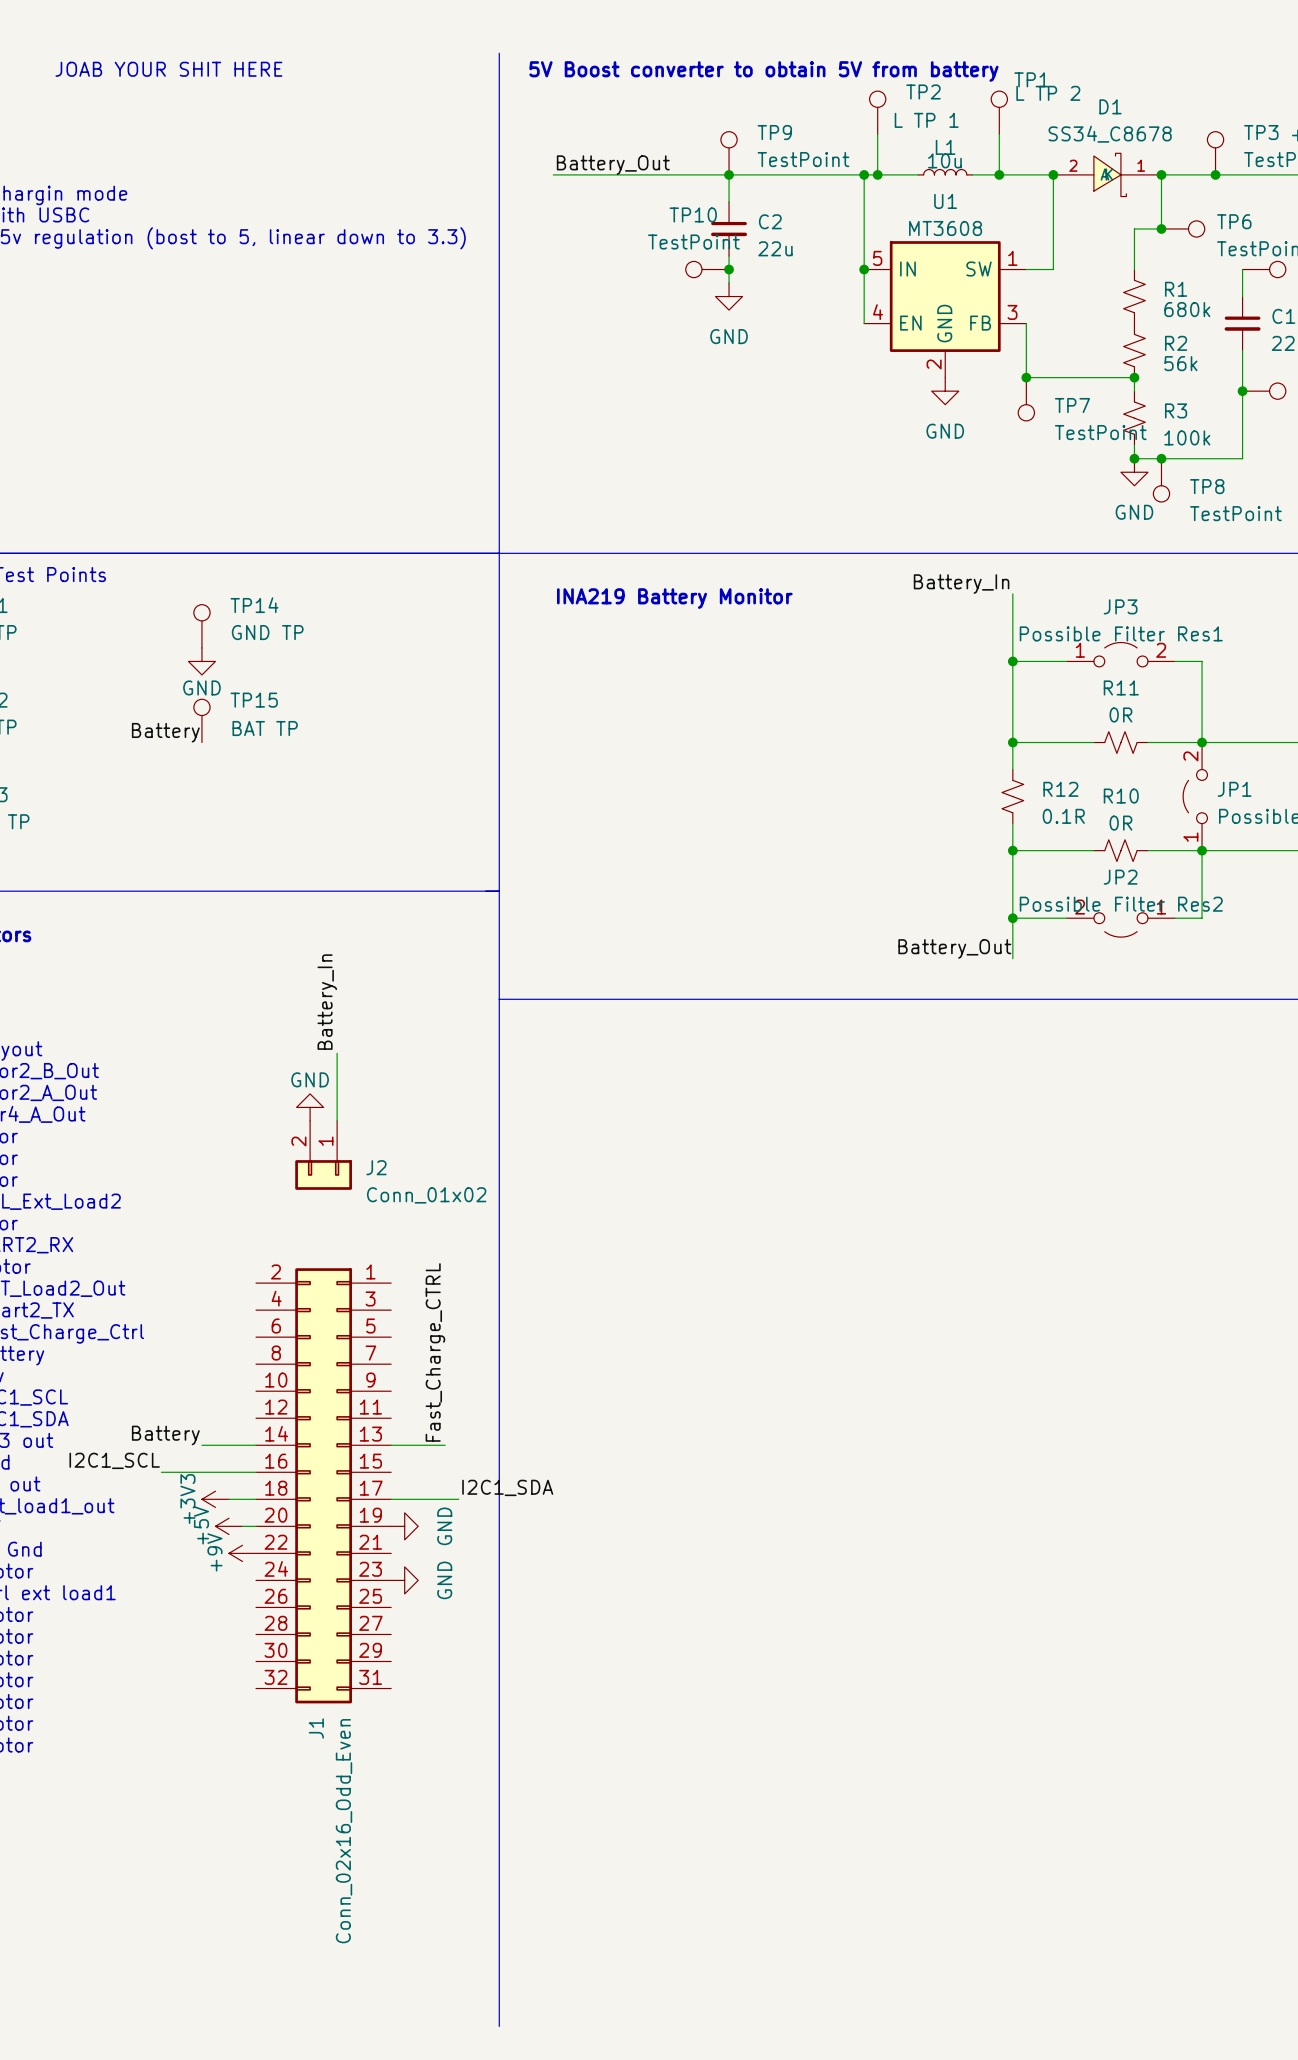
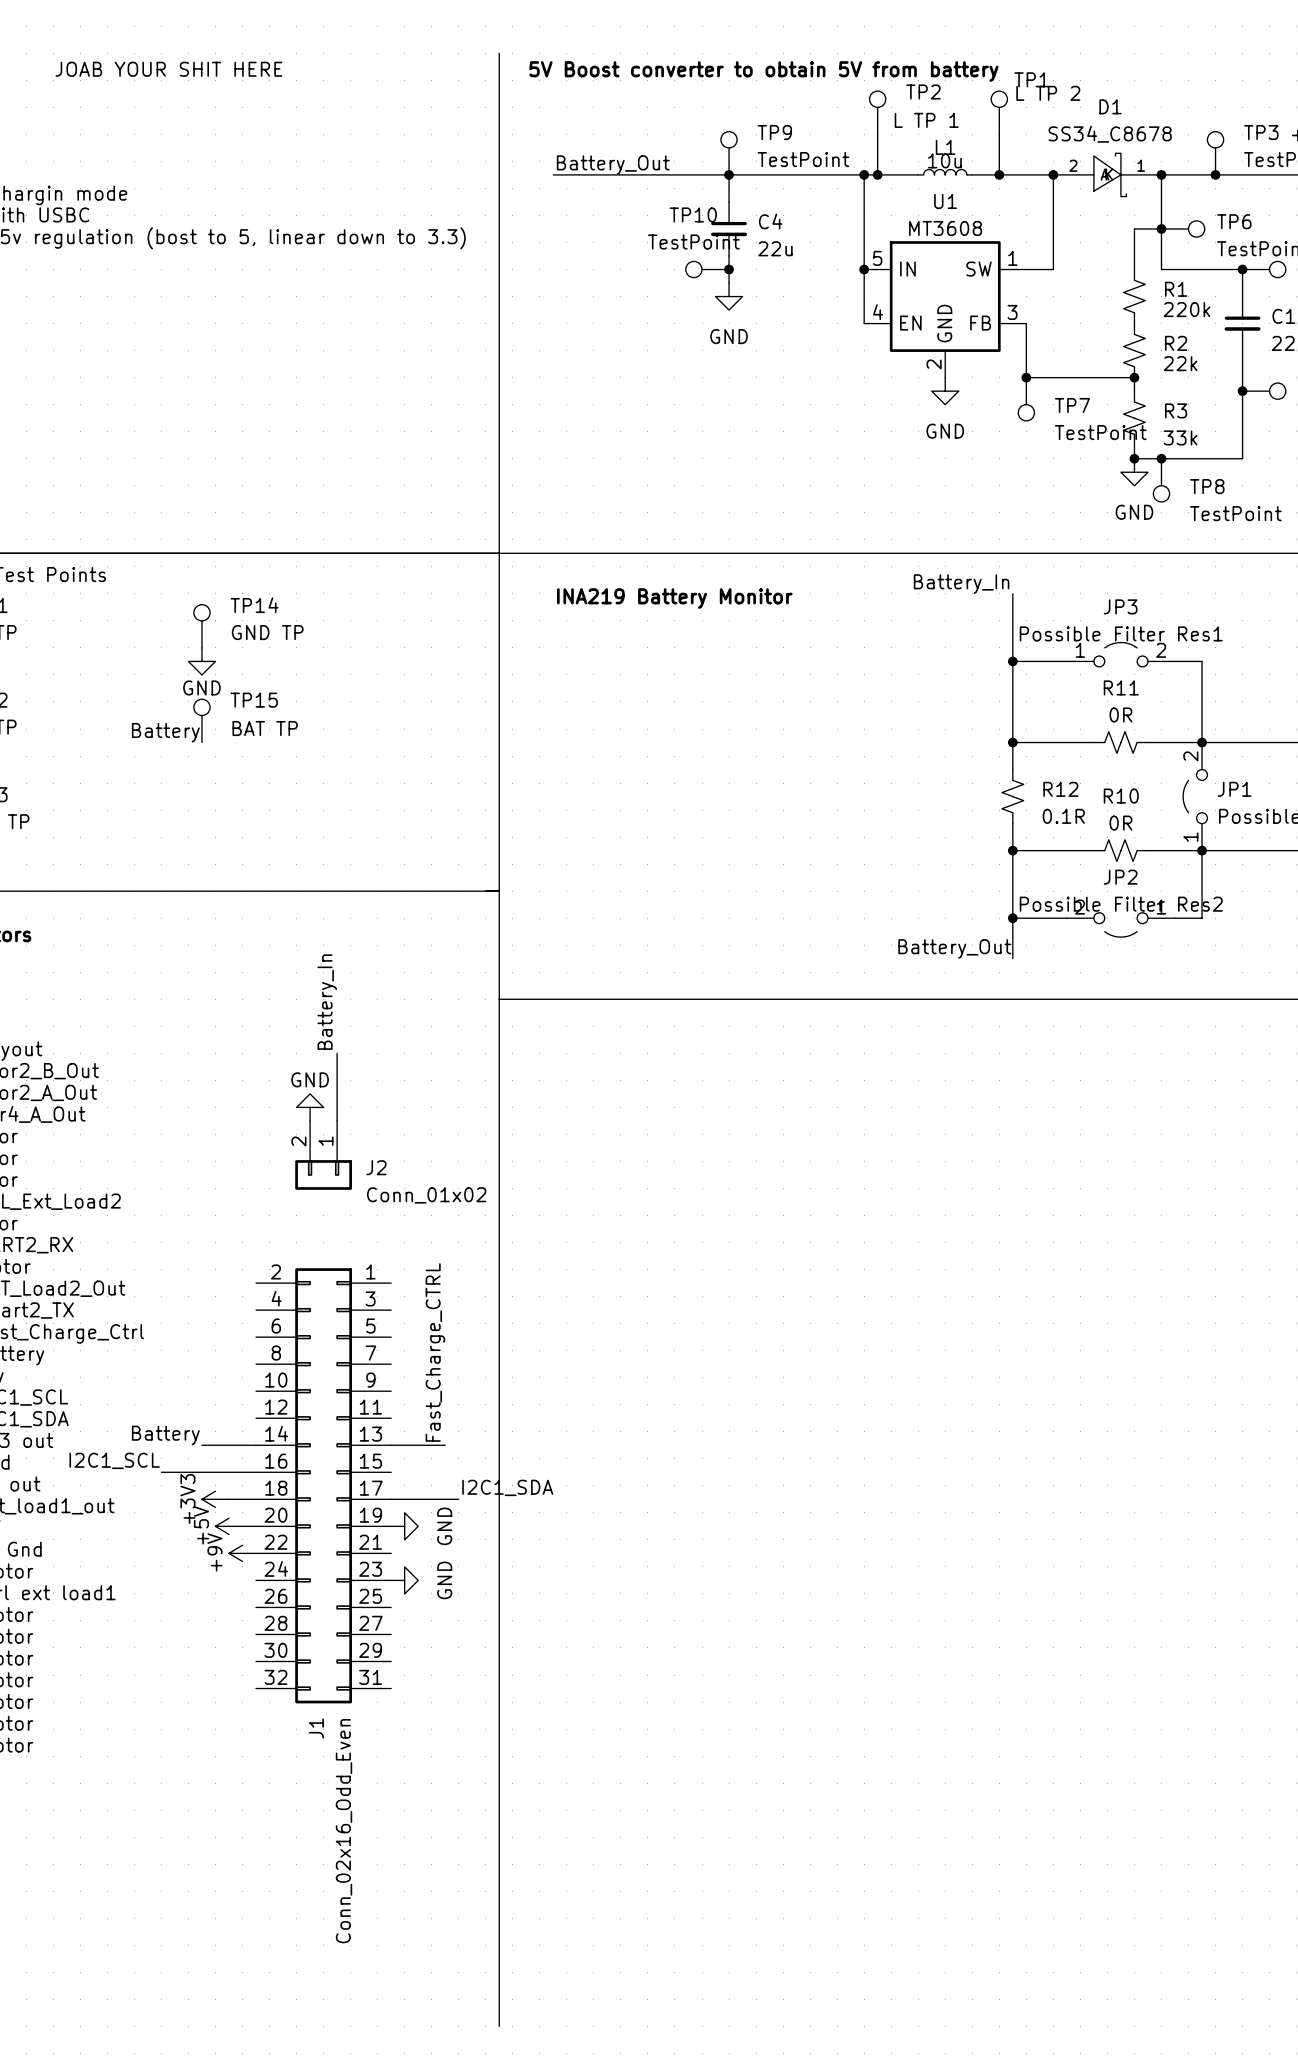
C2 name: C2 (770, 221) -> C4 (770, 221)
wire: none -> (1161, 228) (1161, 269) (1242, 269)
junction: none -> (1242, 269)
R1 value: 680k (1187, 309) -> 220k (1187, 309)
R2 value: 56k (1180, 363) -> 22k (1180, 363)
R3 value: 100k (1187, 437) -> 33k (1180, 437)

